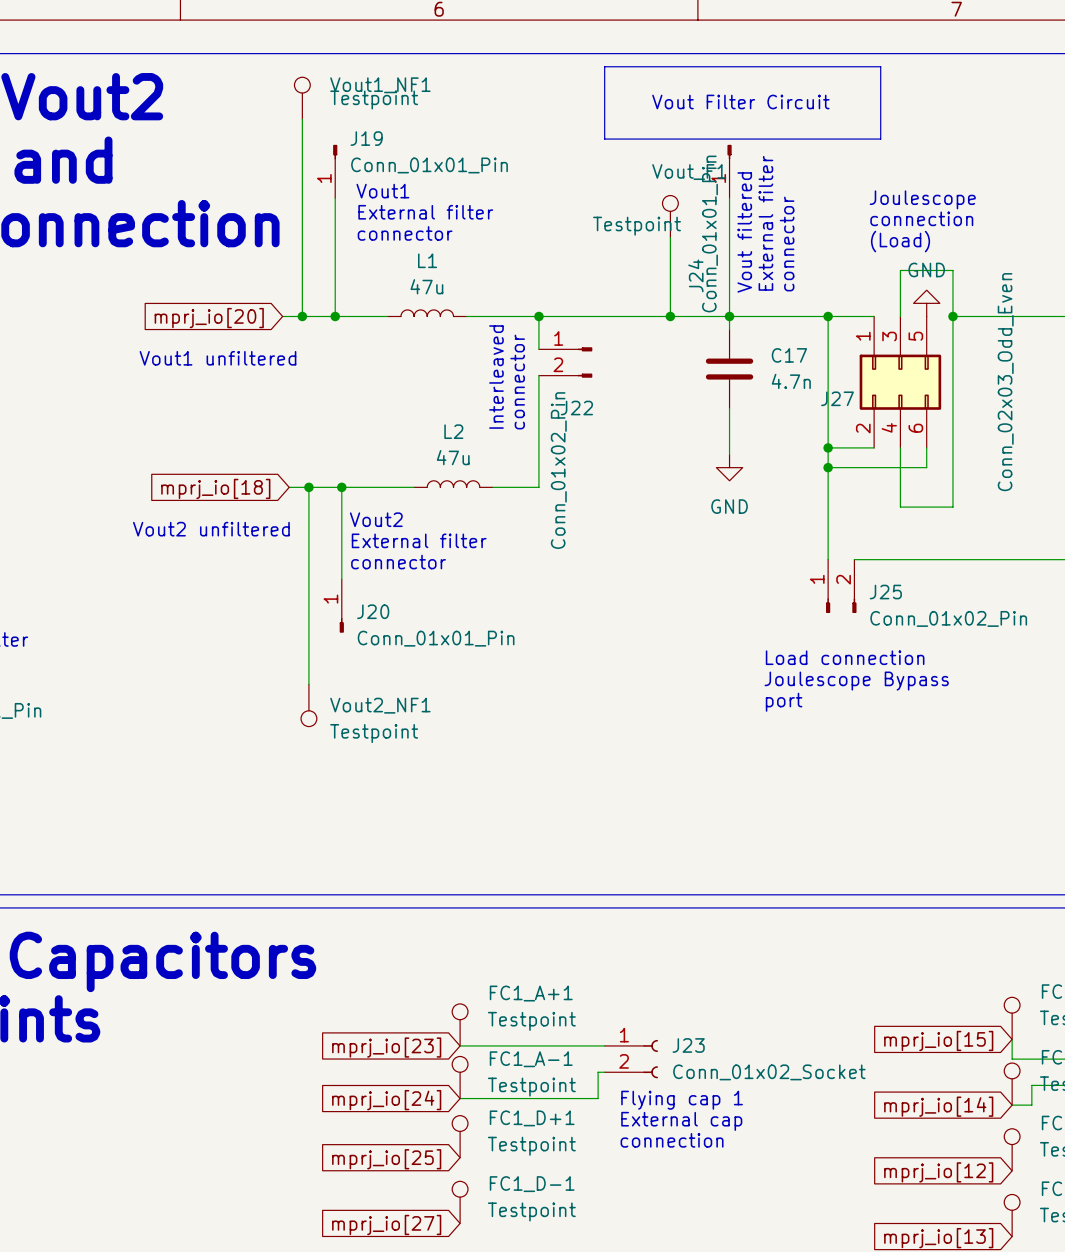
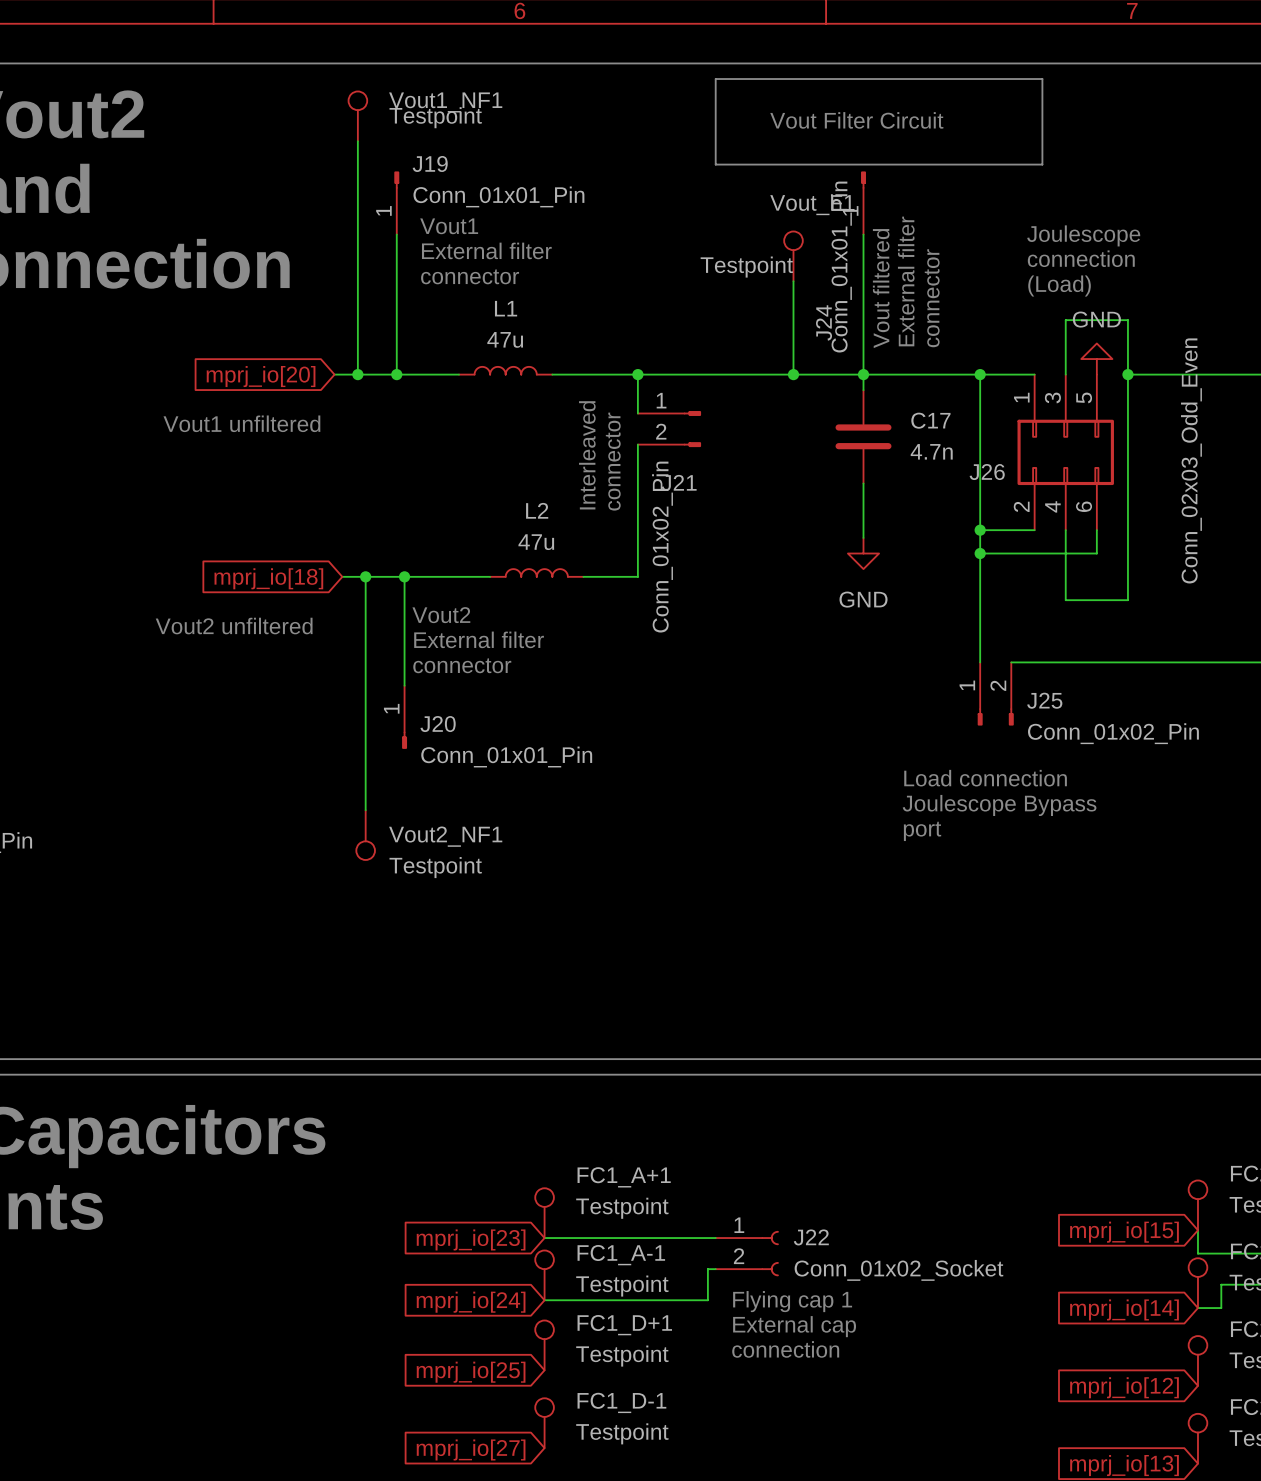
J27 name: J27 (837, 398) -> J26 (987, 472)
J22 name: J22 (576, 408) -> J21 (679, 482)
J23 name: J23 (688, 1045) -> J22 (811, 1237)

